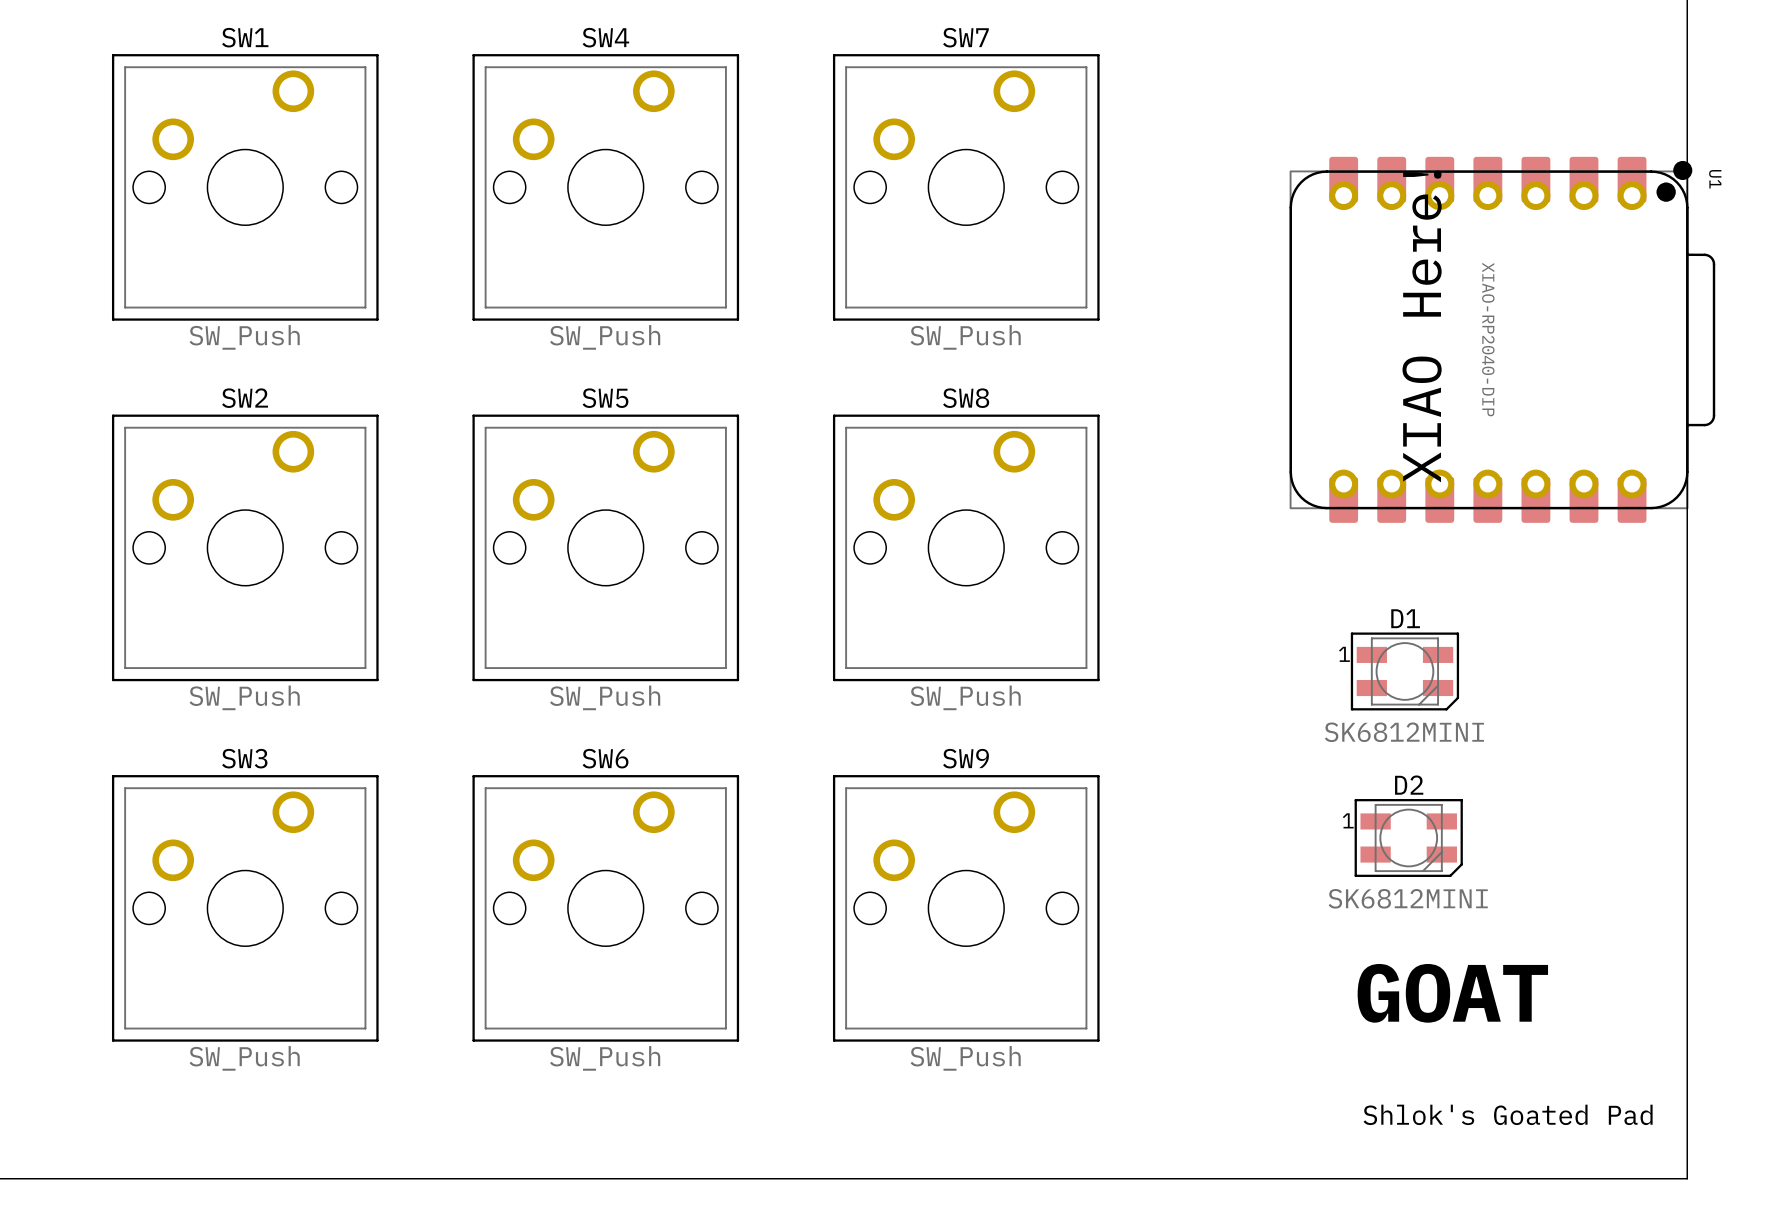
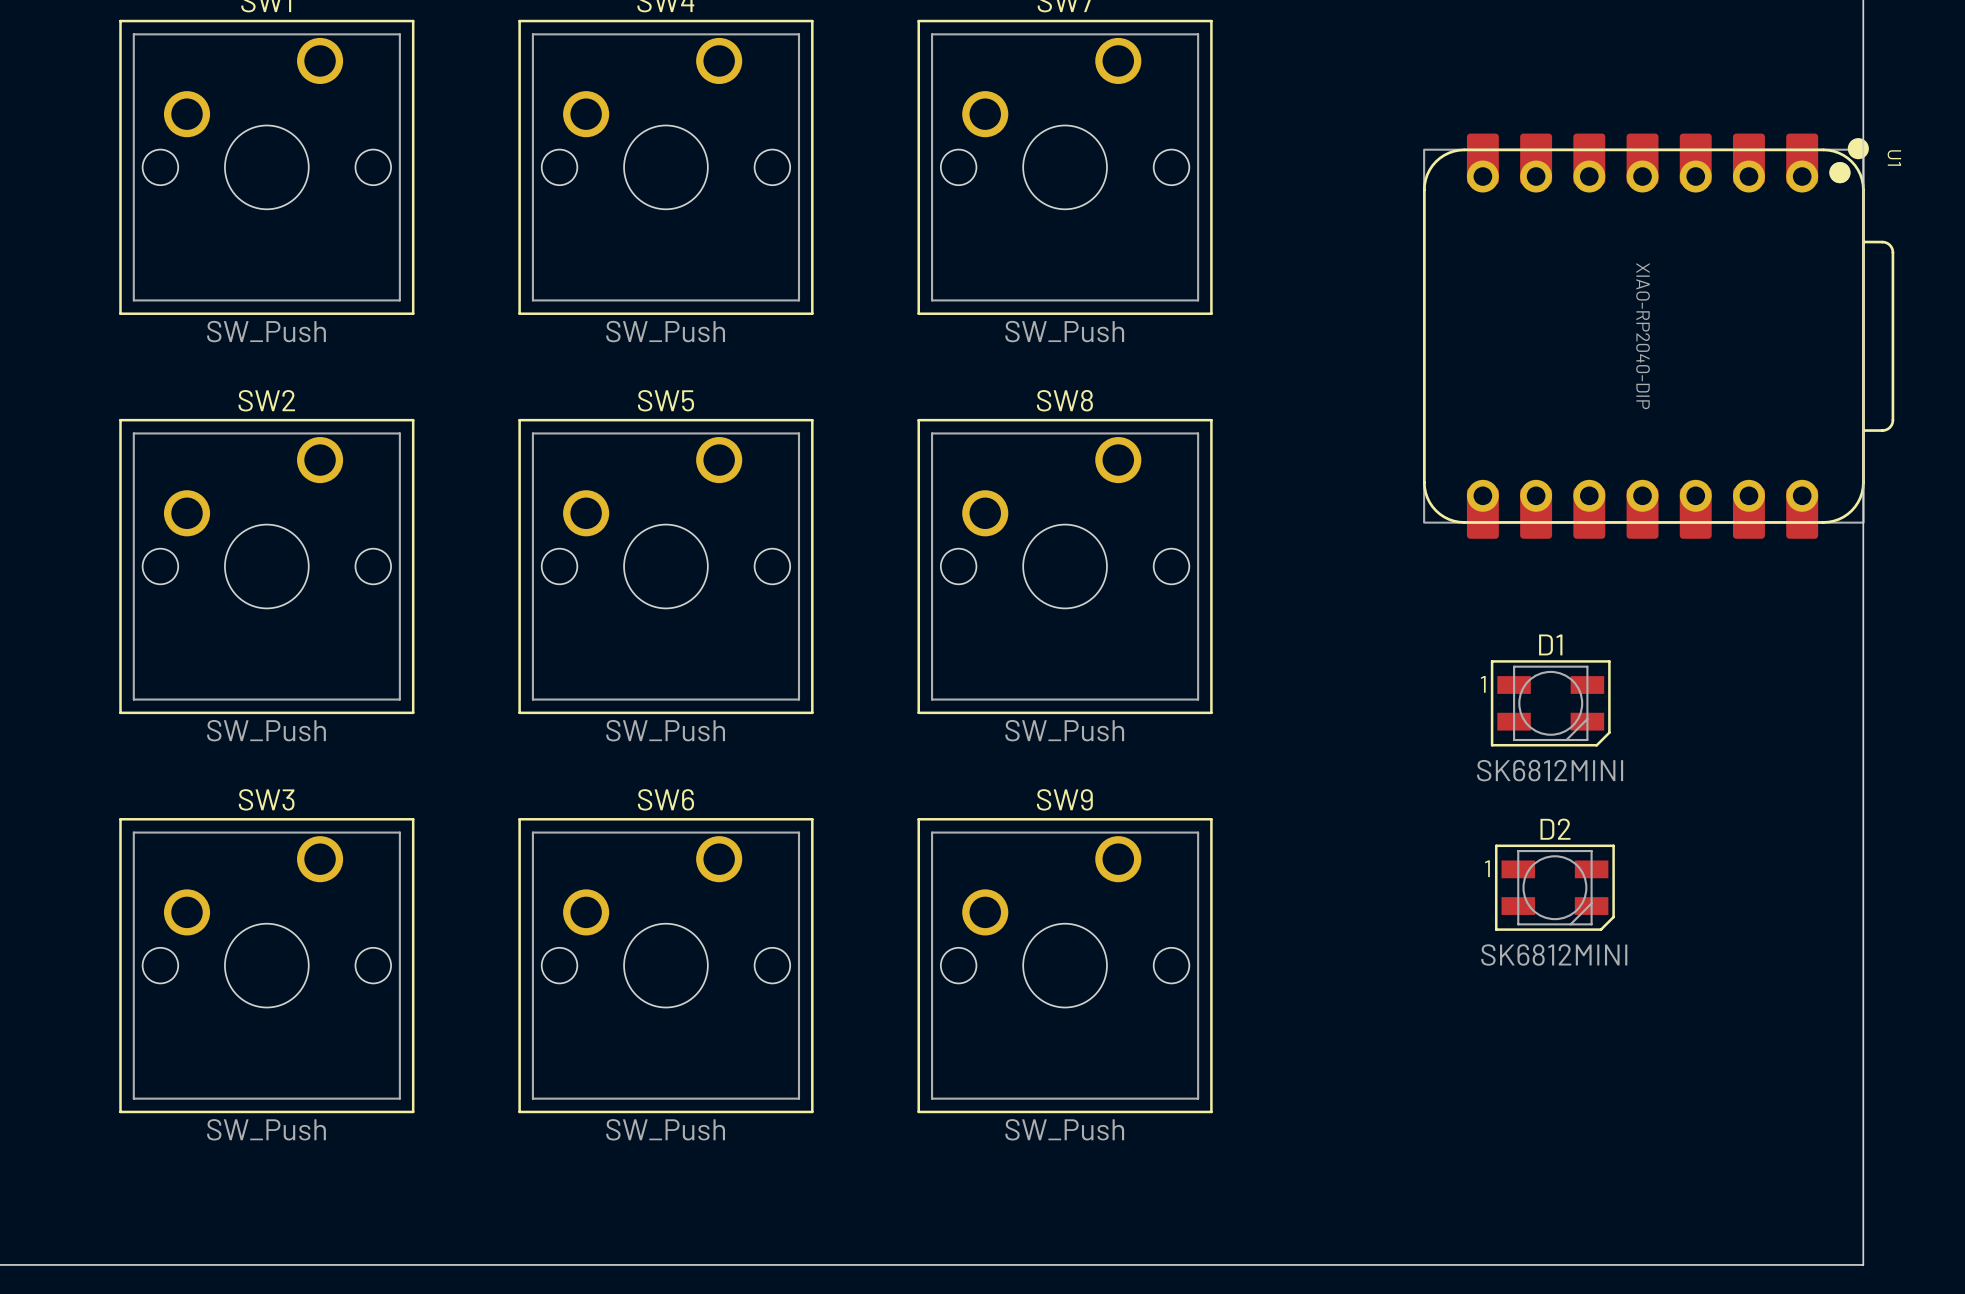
text: XIAO Here! (1422, 326) -> none
text: GOAT (1452, 993) -> none
text: Shlok's Goated Pad (1508, 1114) -> none

